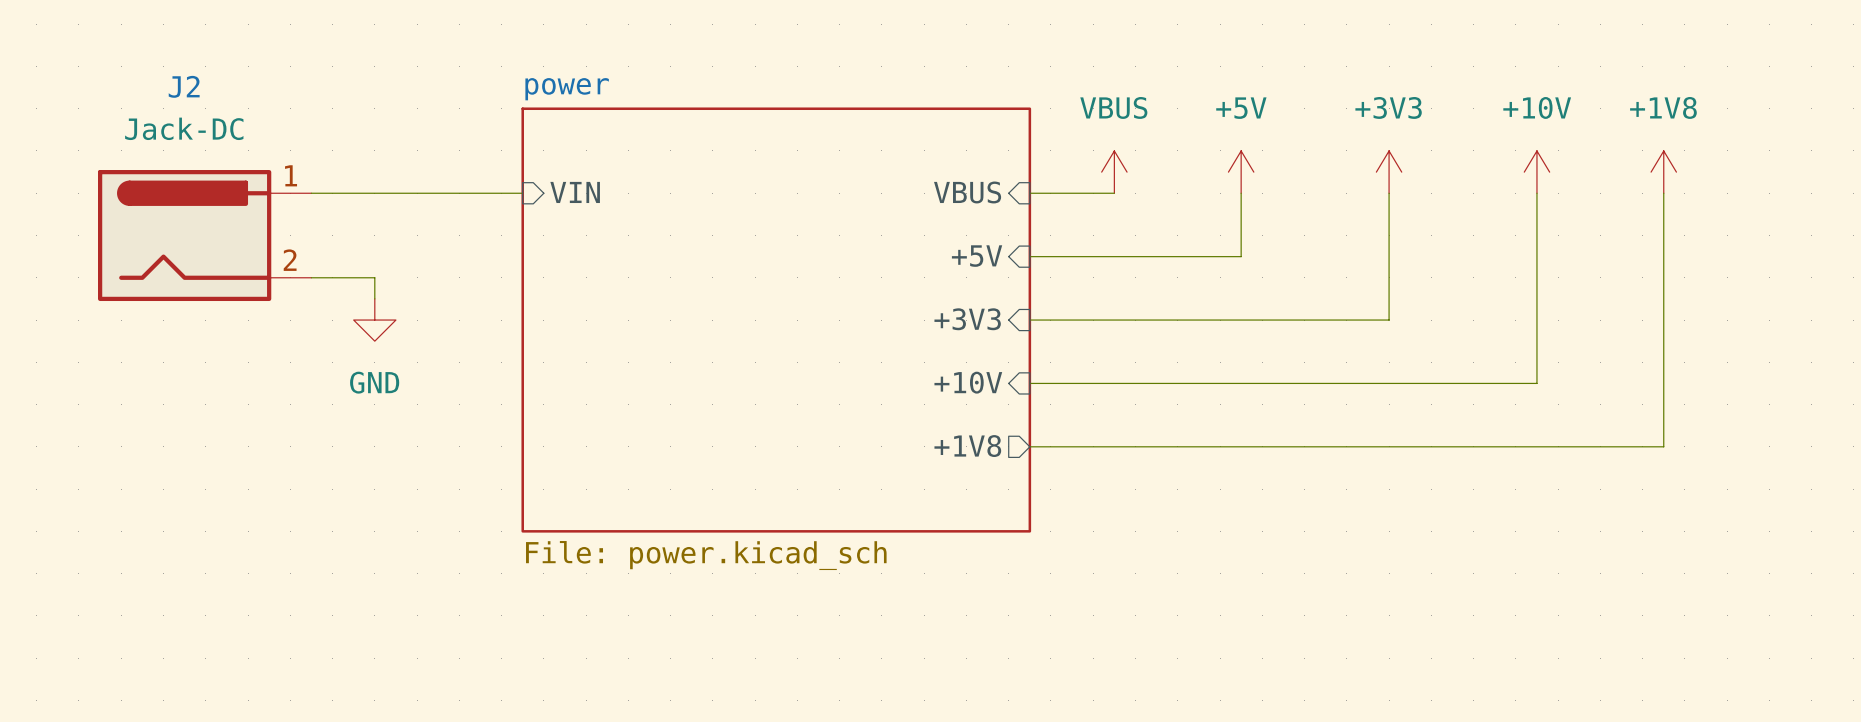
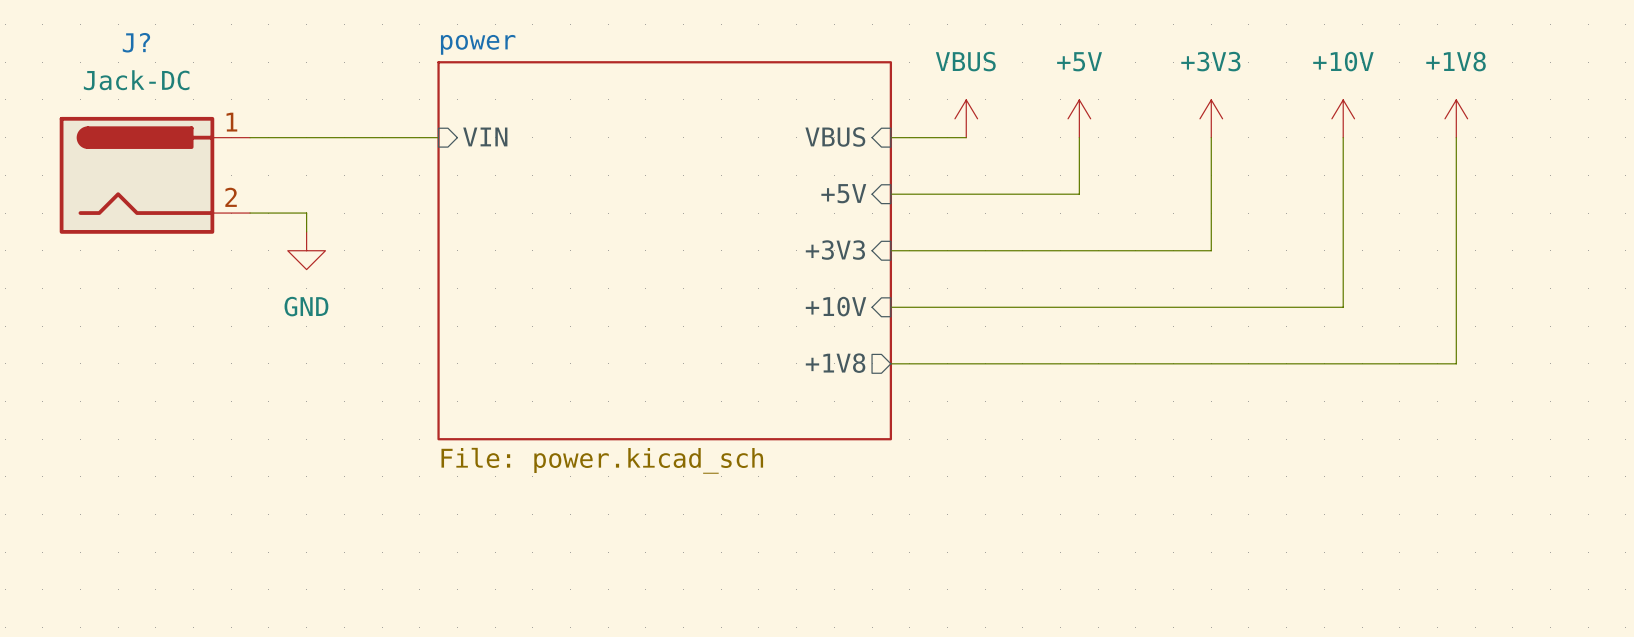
J2 name: J2 (184, 86) -> J? (136, 42)

